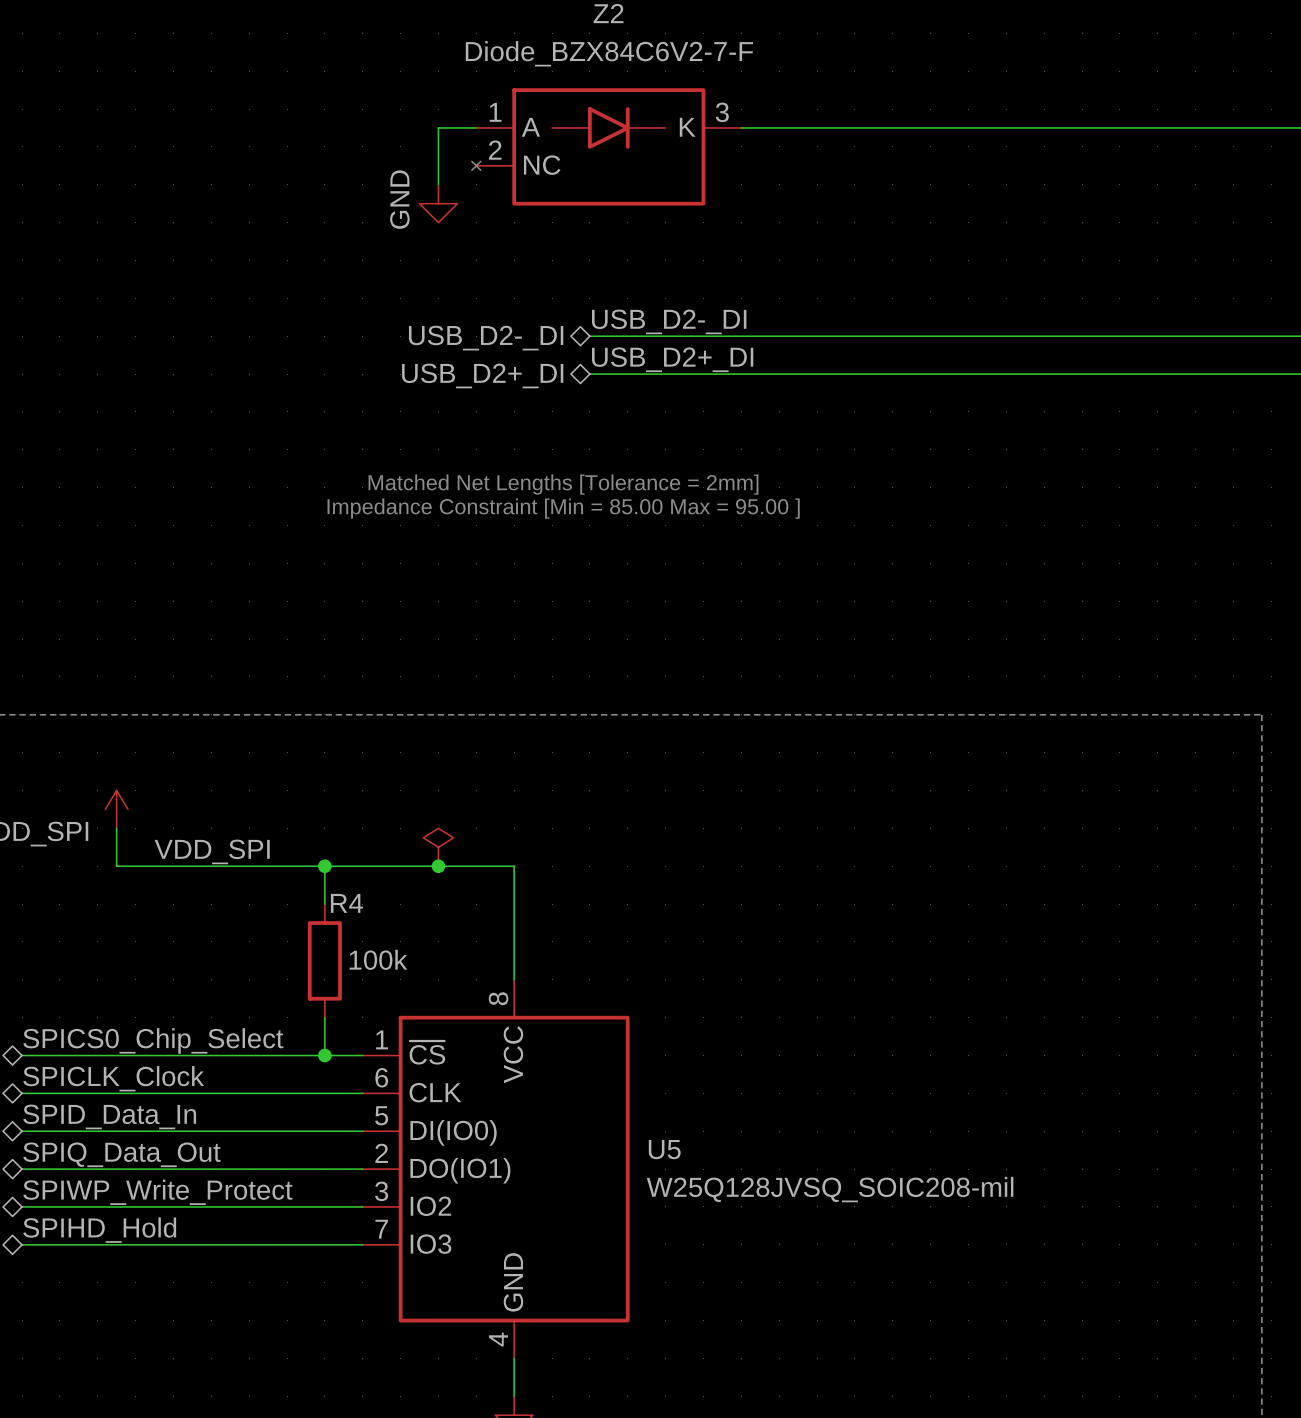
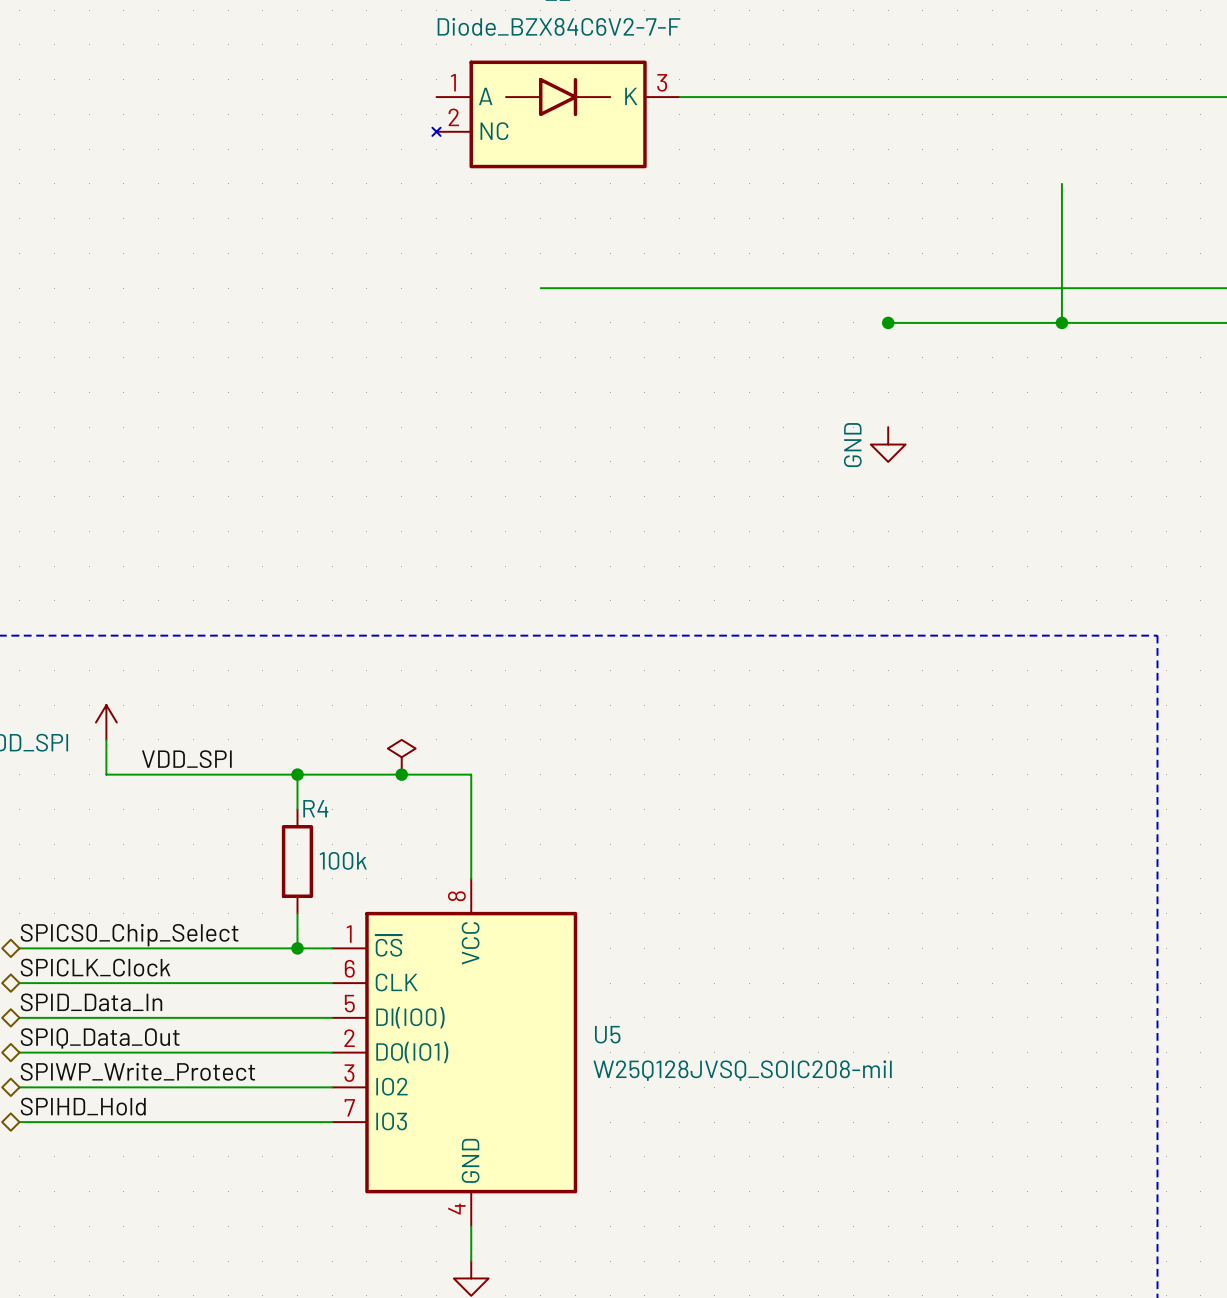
wire: (476, 127) (438, 127) (438, 184) -> none
power symbol: GND (438, 203) -> none
wire: none -> (1061, 183) (1061, 322)
label: USB_D2-_DI (669, 321) -> none
hierarchical label: USB_D2-_DI (486, 338) -> none
label: USB_D2+_DI (672, 359) -> none
wire: (589, 374) (968, 374) -> none
junction: none -> (888, 322)
junction: none -> (1061, 322)
hierarchical label: USB_D2+_DI (482, 375) -> none
text: Matched Net Lengths [Tolerance = 2mm] (563, 484) -> none
power symbol: none -> GND (888, 444)
text: Impedance Constraint [Min = 85.00 Max = 95.00 ] (563, 508) -> none

